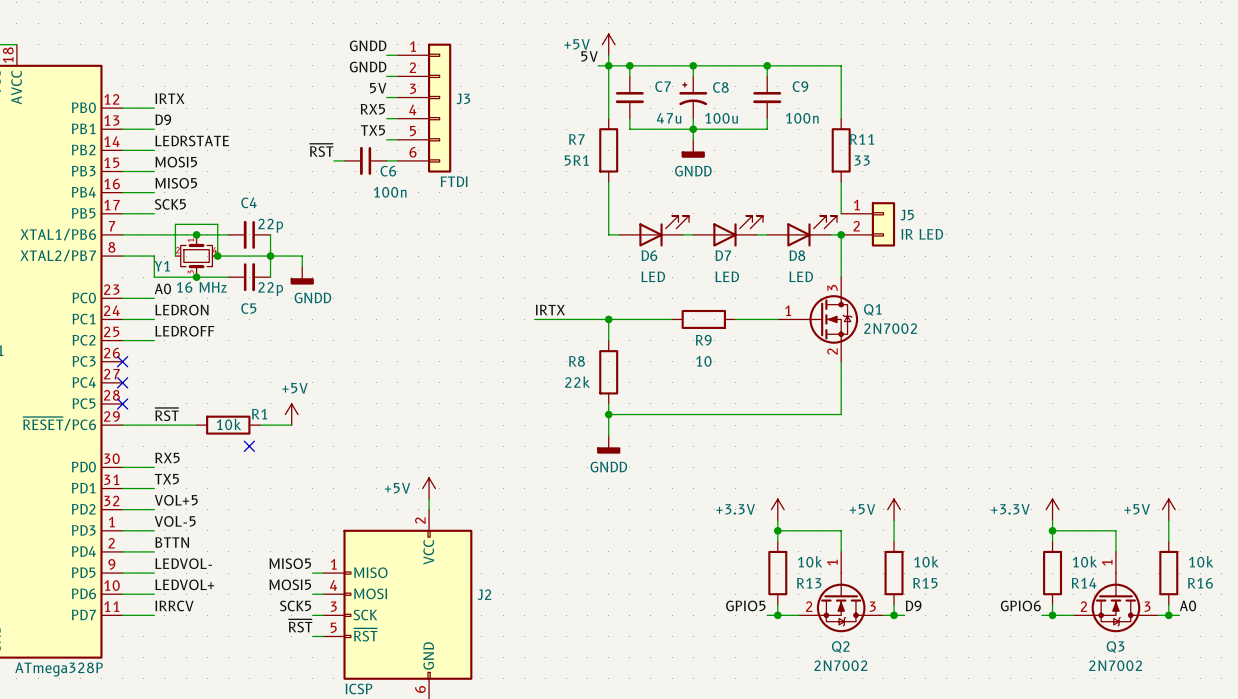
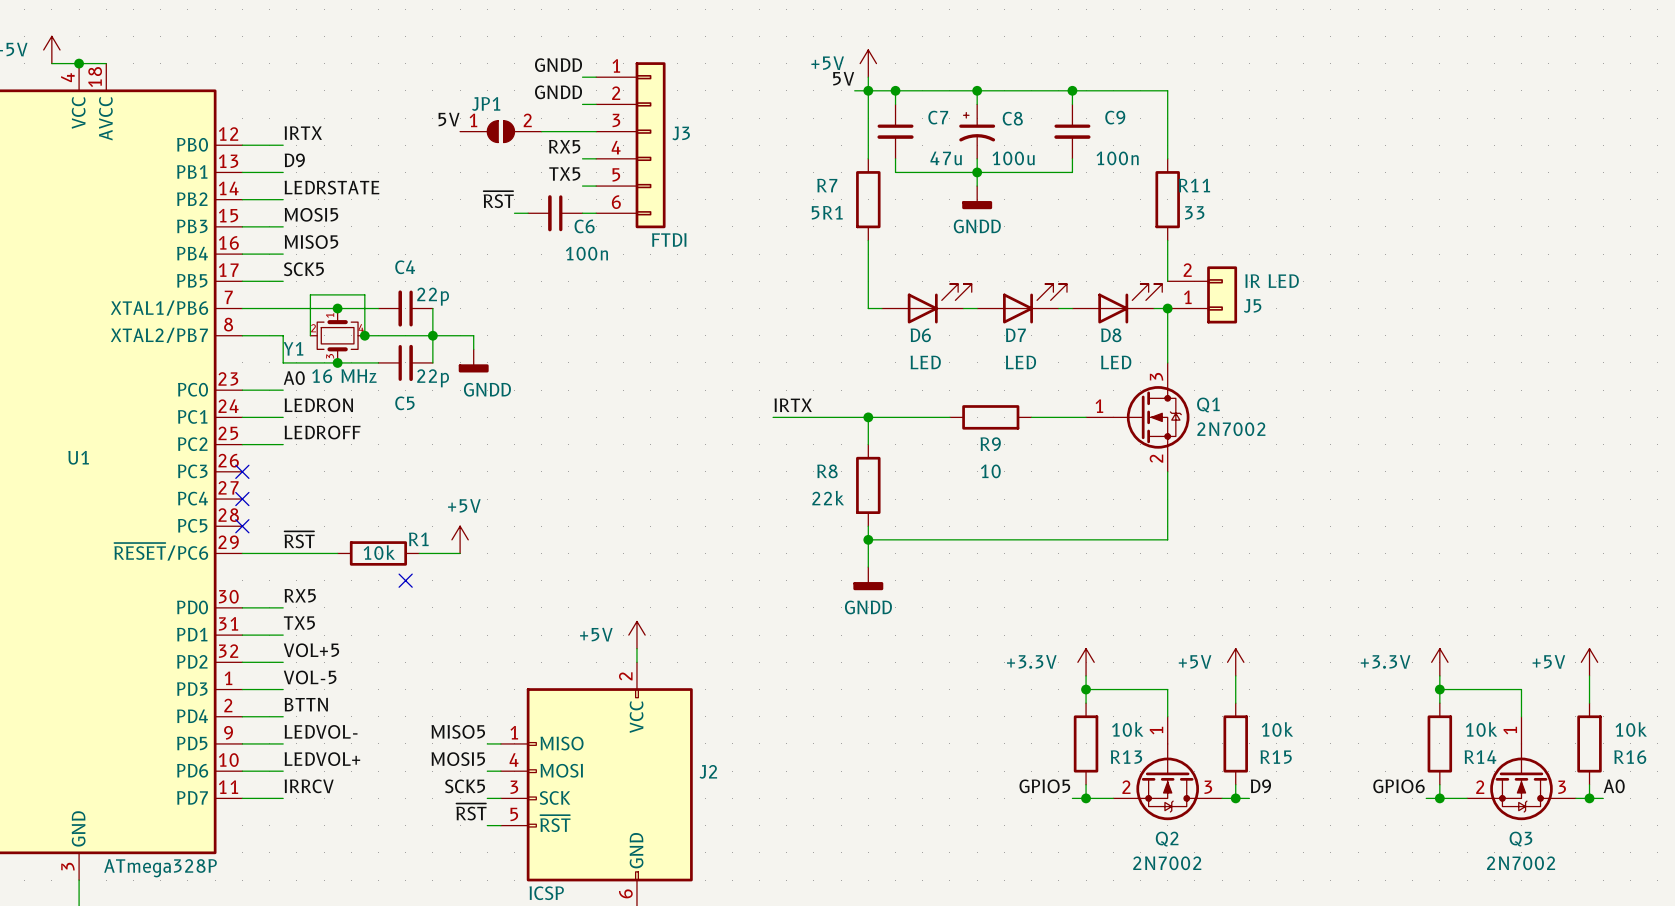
label position: 5V (378, 88) -> 5V (449, 119)
JP1: none -> (500, 131)
wire: none -> (541, 131) (582, 131)
J5 flip: as is (883, 224) -> up-down (1222, 294)

